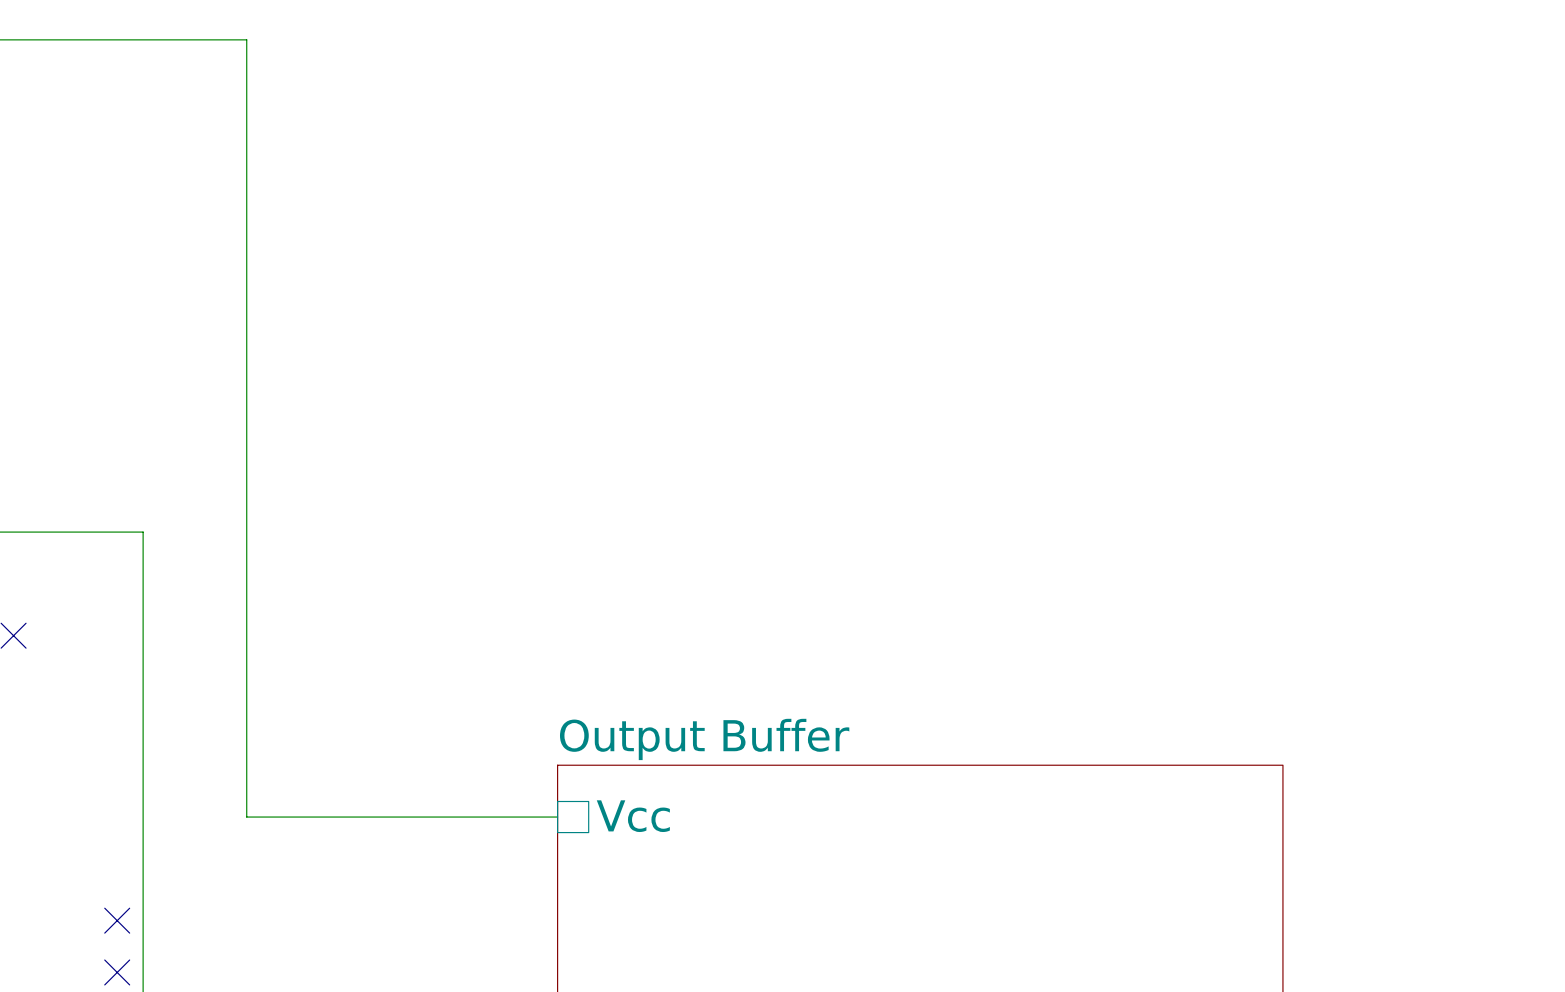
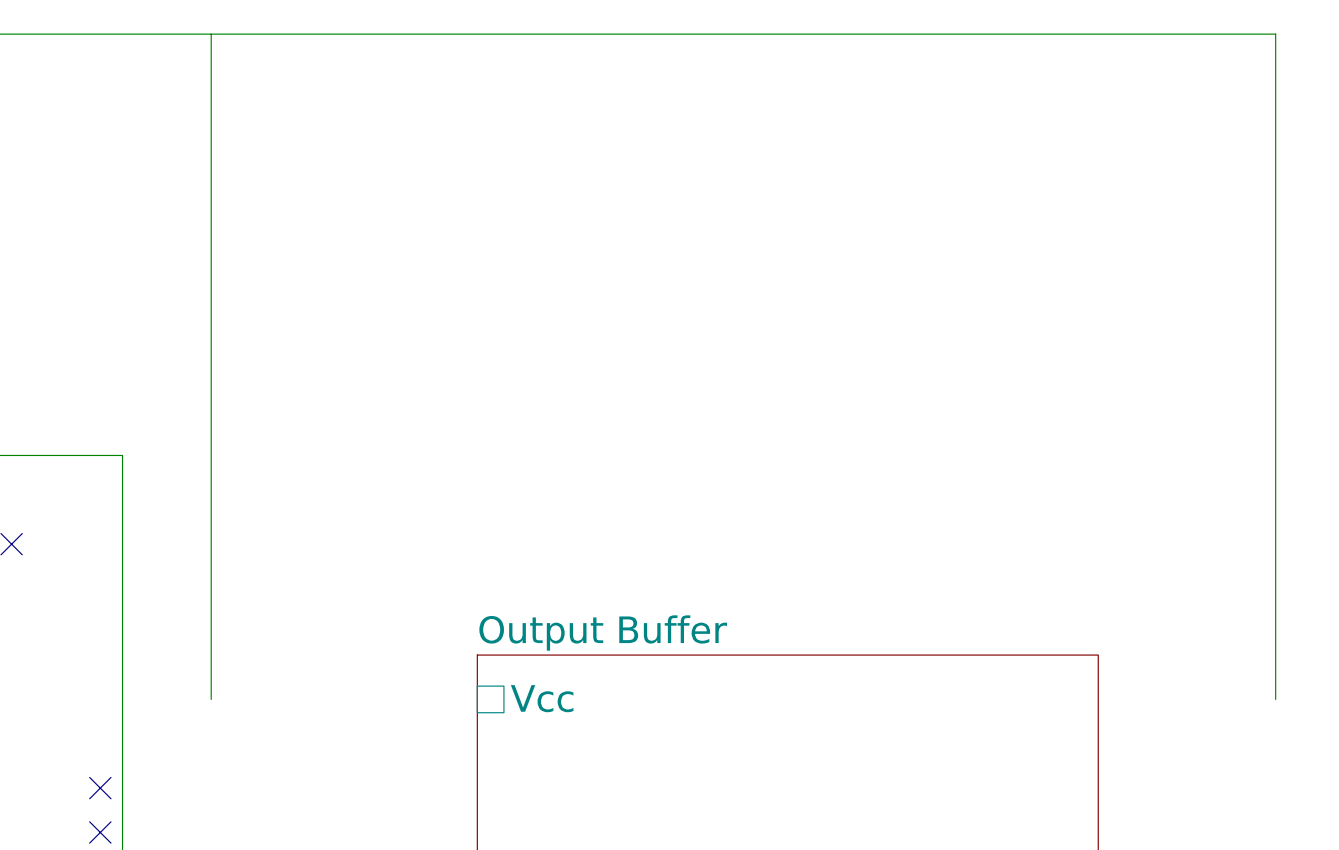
wire: none -> (211, 34) (1275, 34) (1275, 699)
wire: (246, 817) (557, 817) -> none

